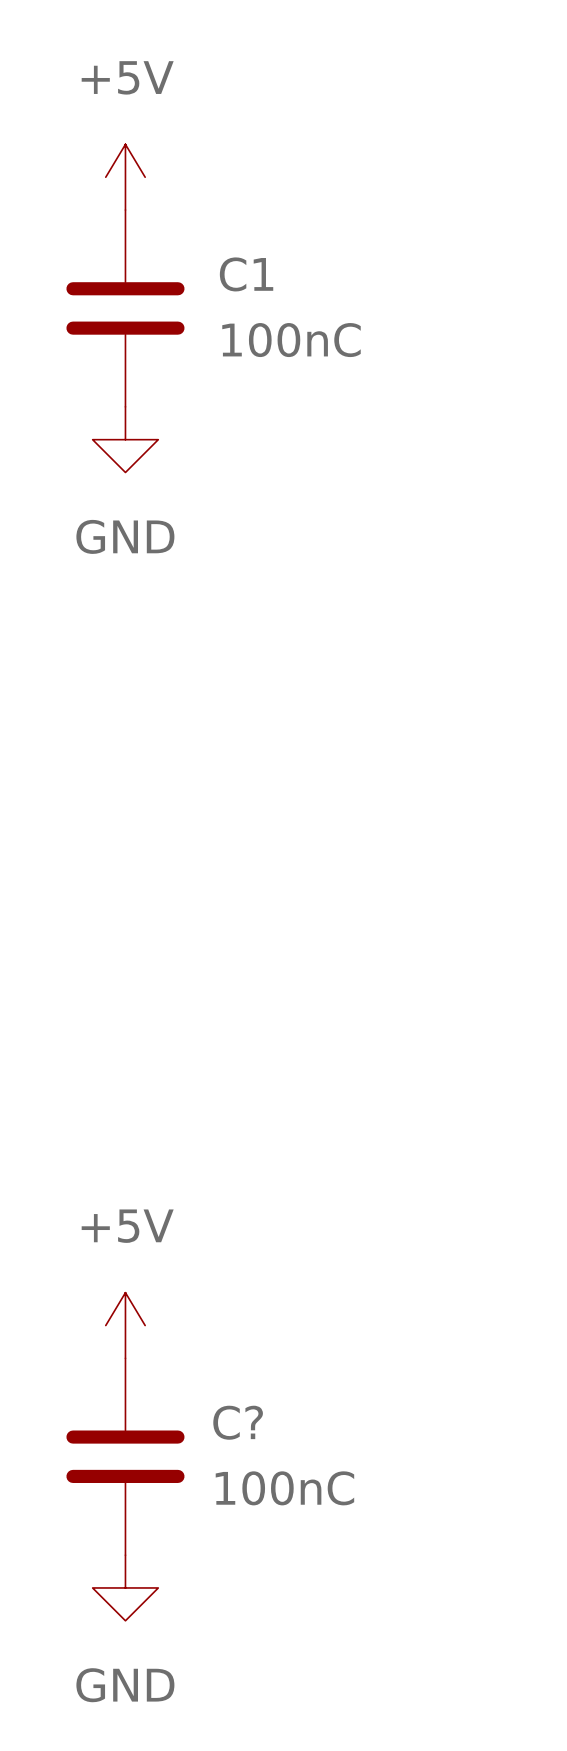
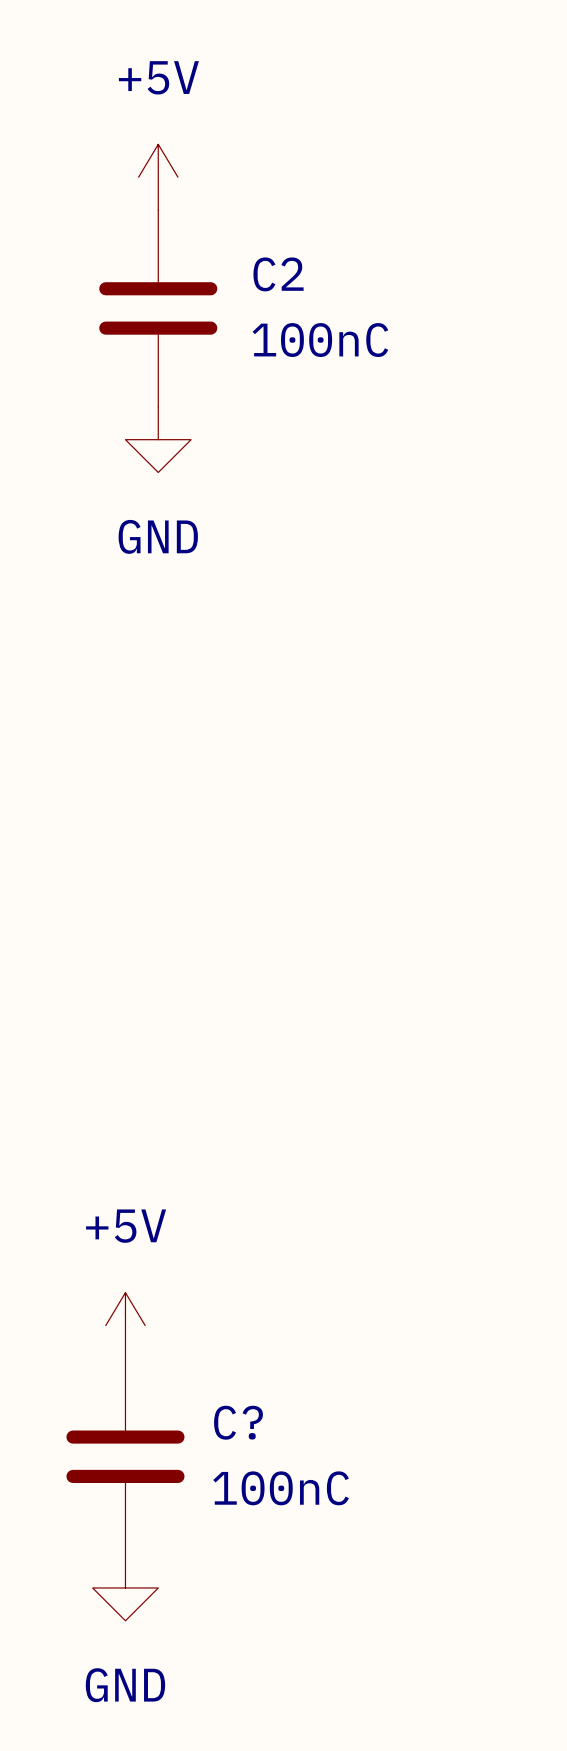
power symbol position: +5V (125, 177) -> +5V (158, 177)
C1: 100nC (125, 308) -> none
C2: none -> 100nC (158, 308)
power symbol position: GND (125, 439) -> GND (158, 439)

